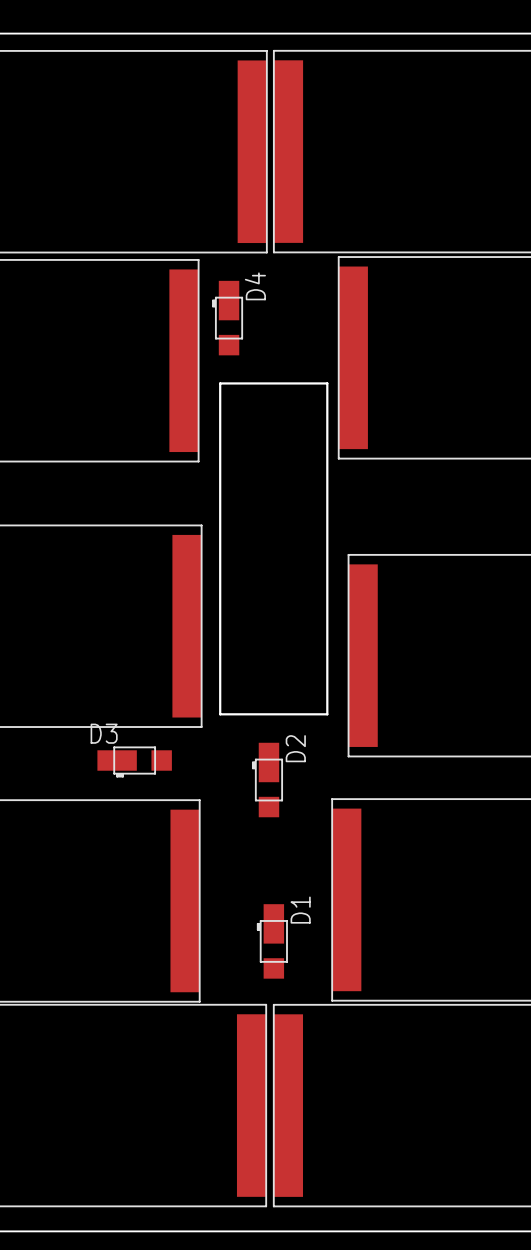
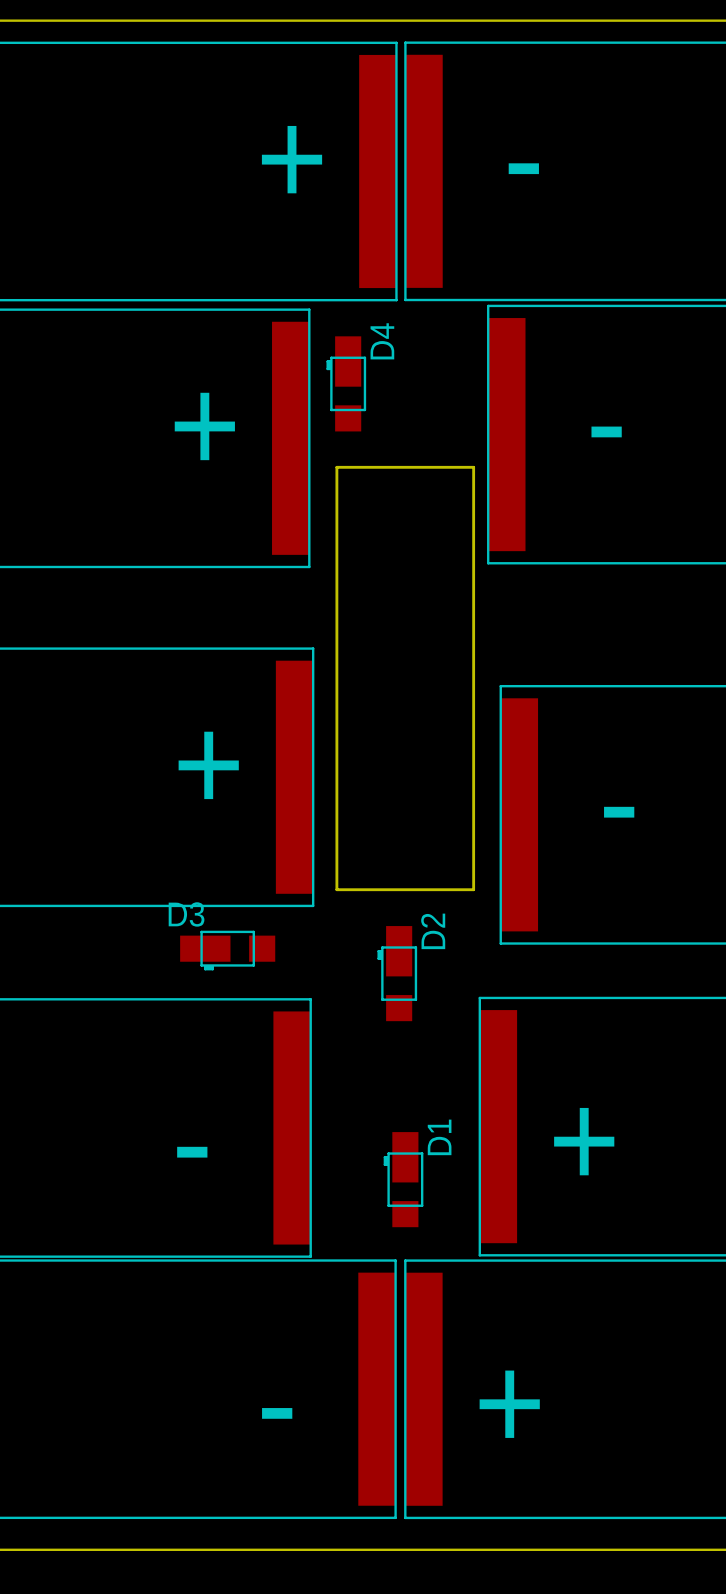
part text: none -> - (523, 168)
part text: none -> + (292, 159)
part text: none -> - (606, 431)
part text: none -> + (204, 426)
part text: none -> + (208, 765)
part text: none -> - (619, 812)
part text: none -> + (584, 1141)
part text: none -> - (192, 1152)
part text: none -> - (277, 1413)
part text: none -> + (509, 1404)

